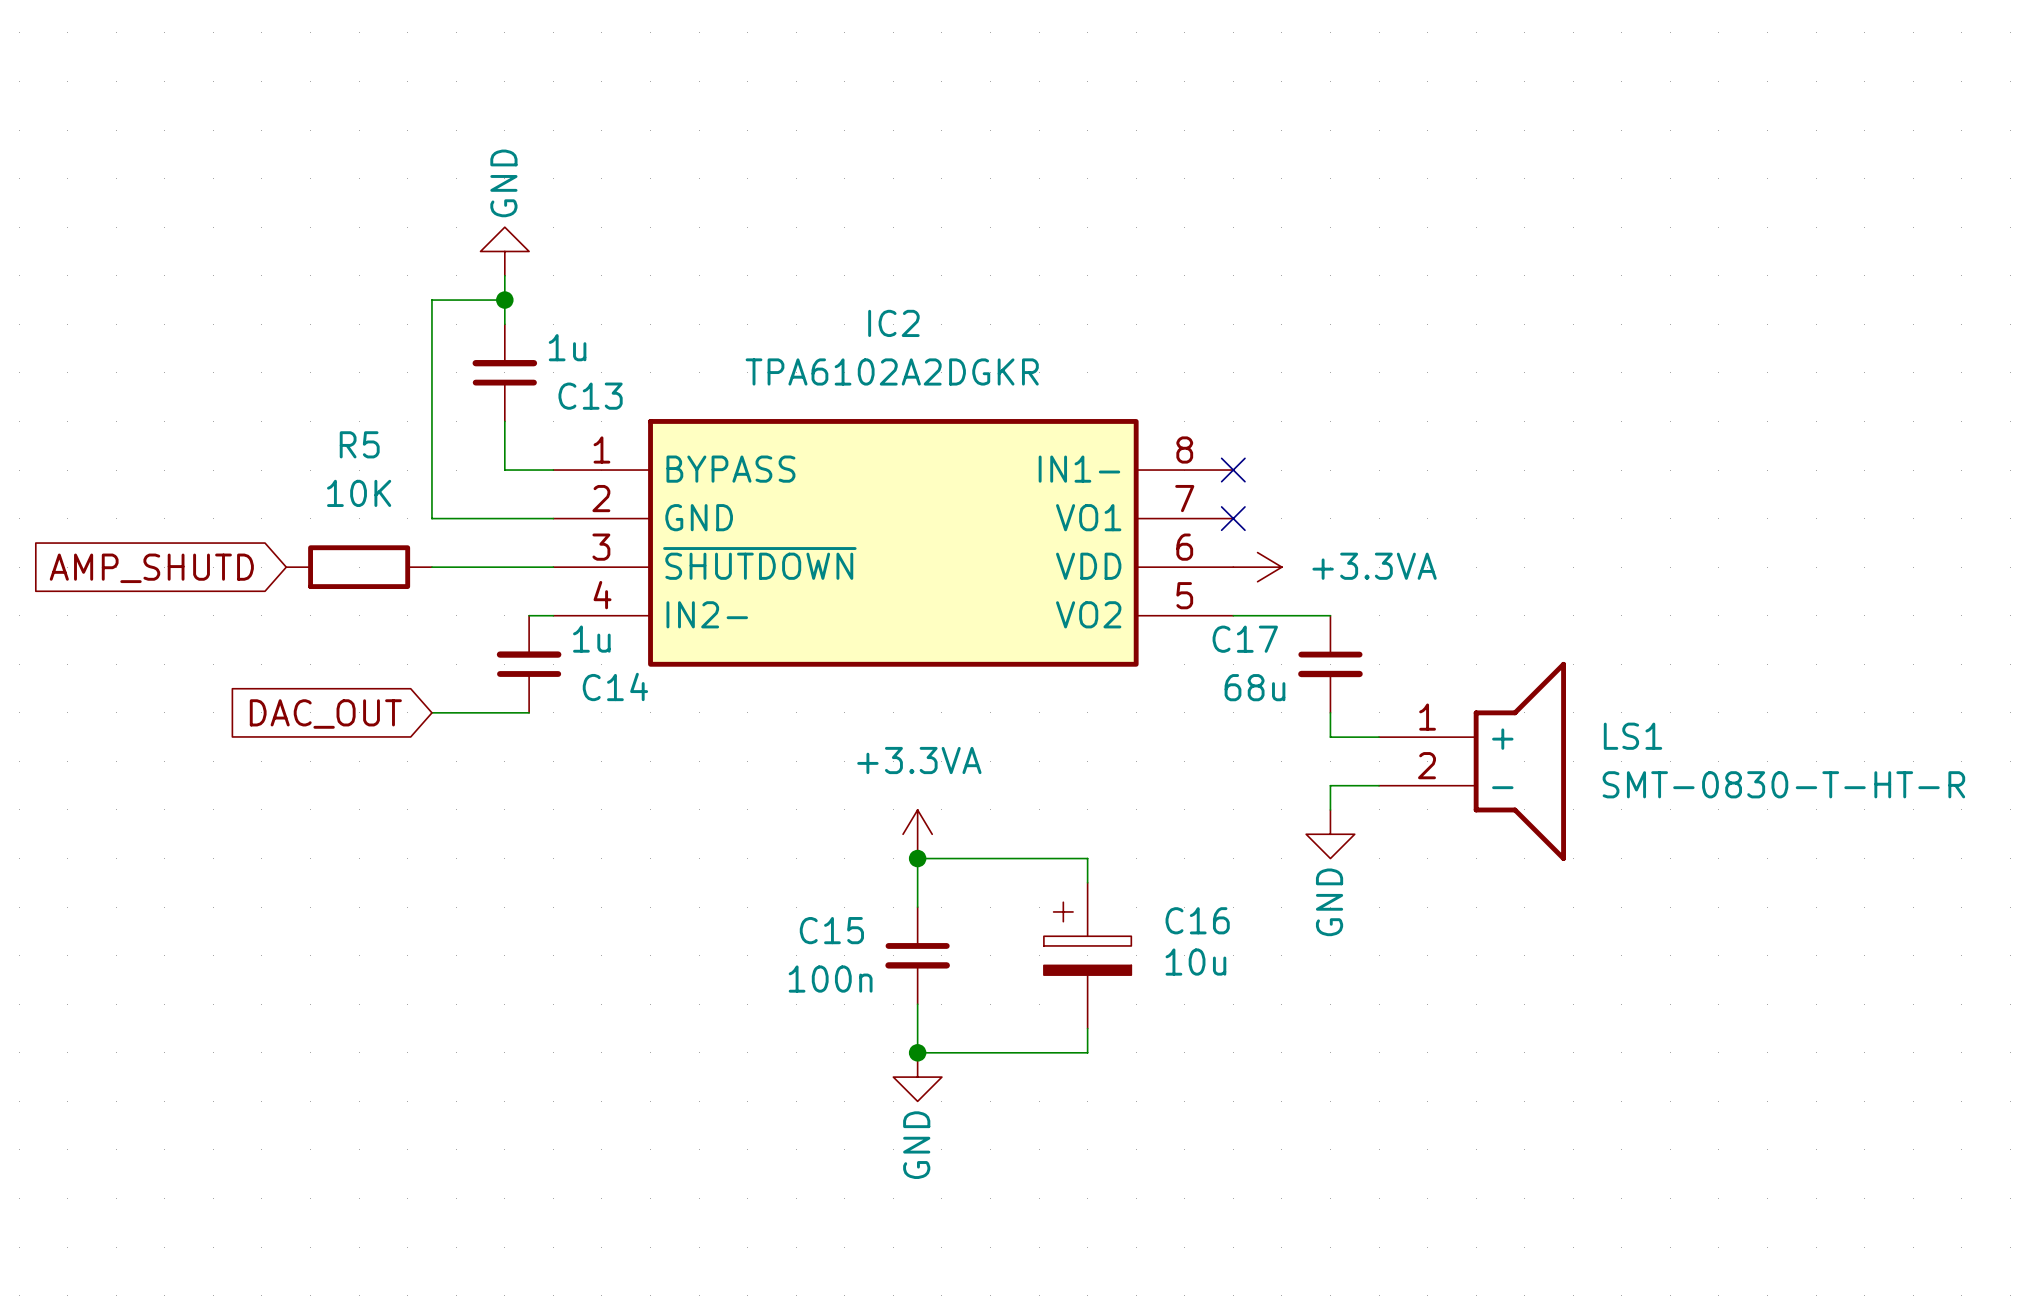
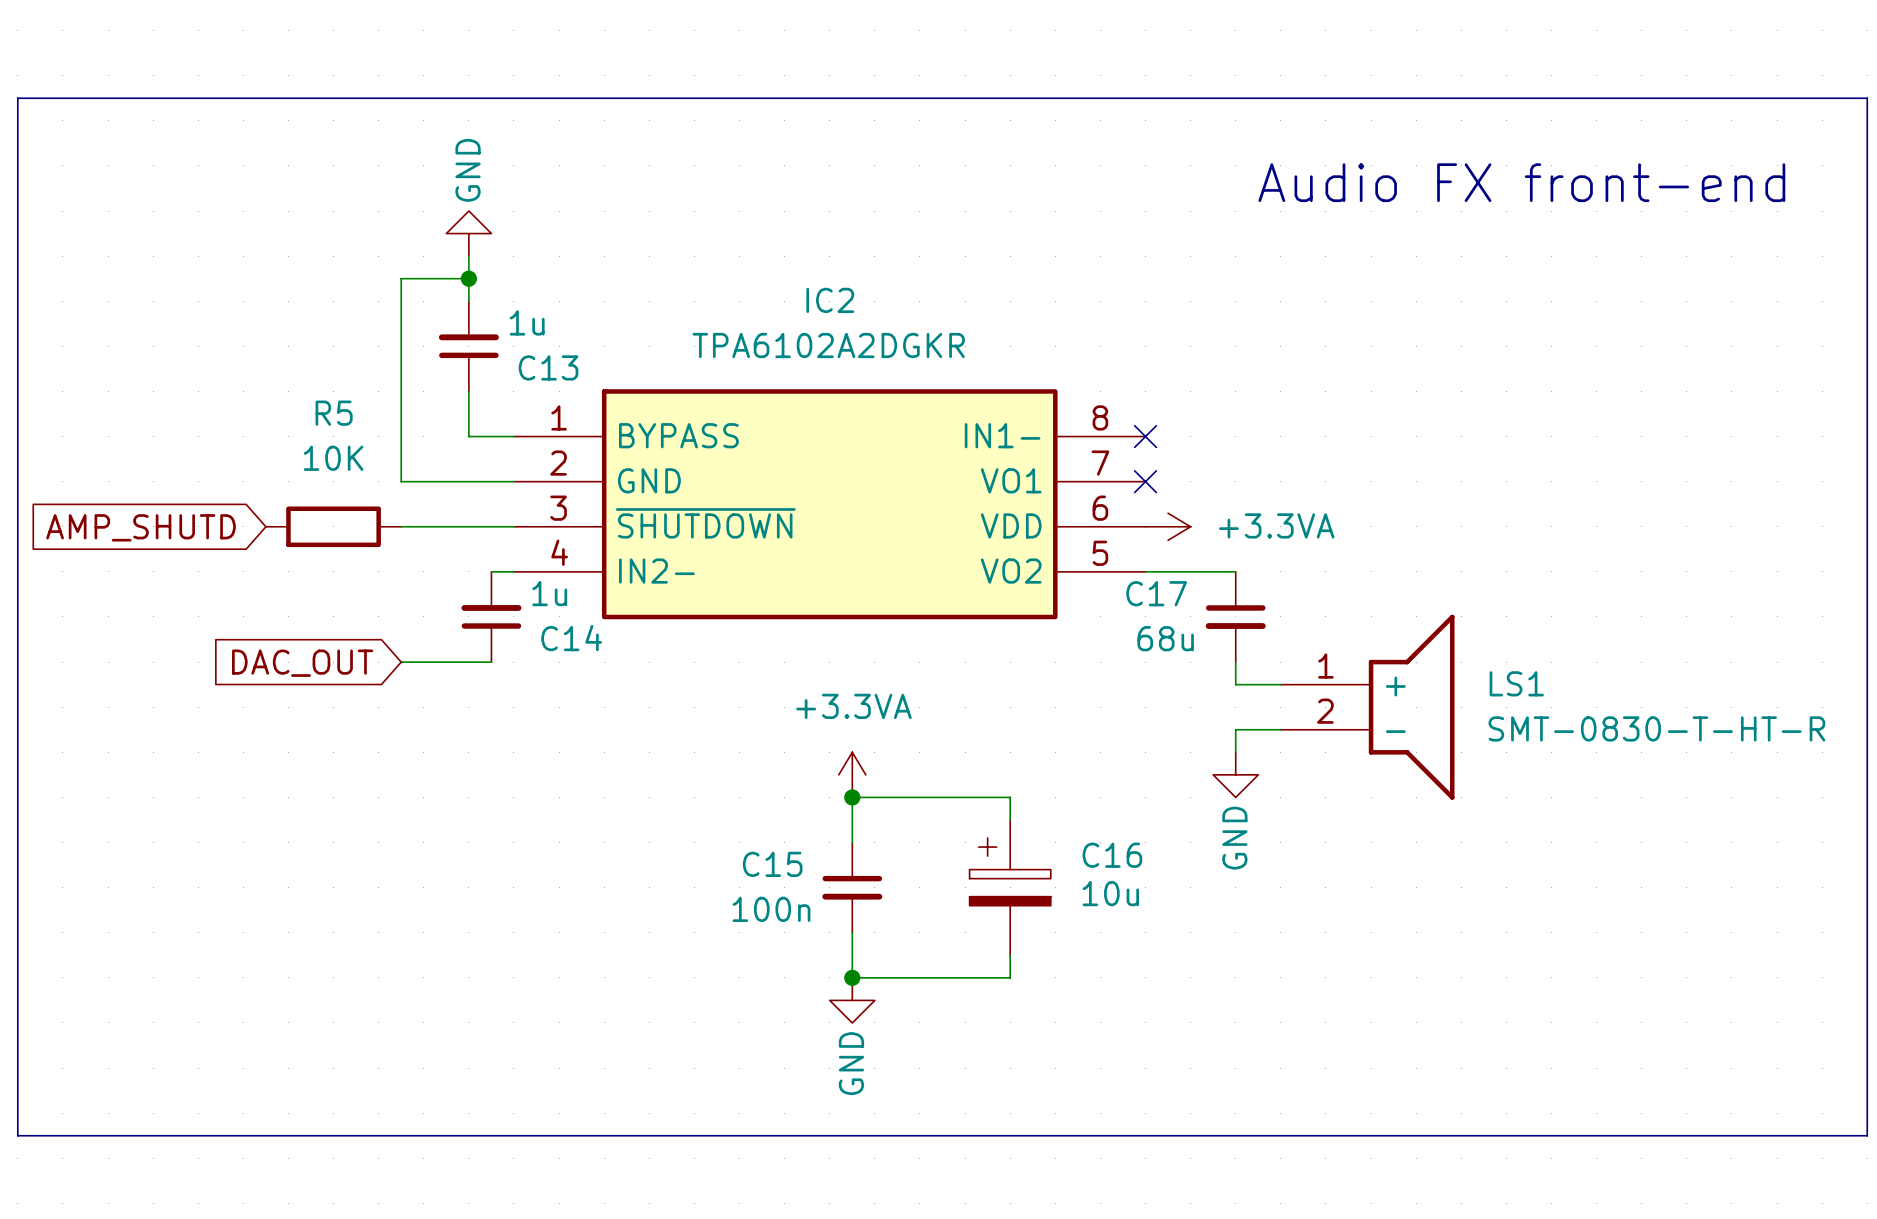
line: none -> (17, 98) (1867, 98) (1867, 1135) (17, 1135) (17, 98)
text: none -> Audio FX front-end (1521, 182)

